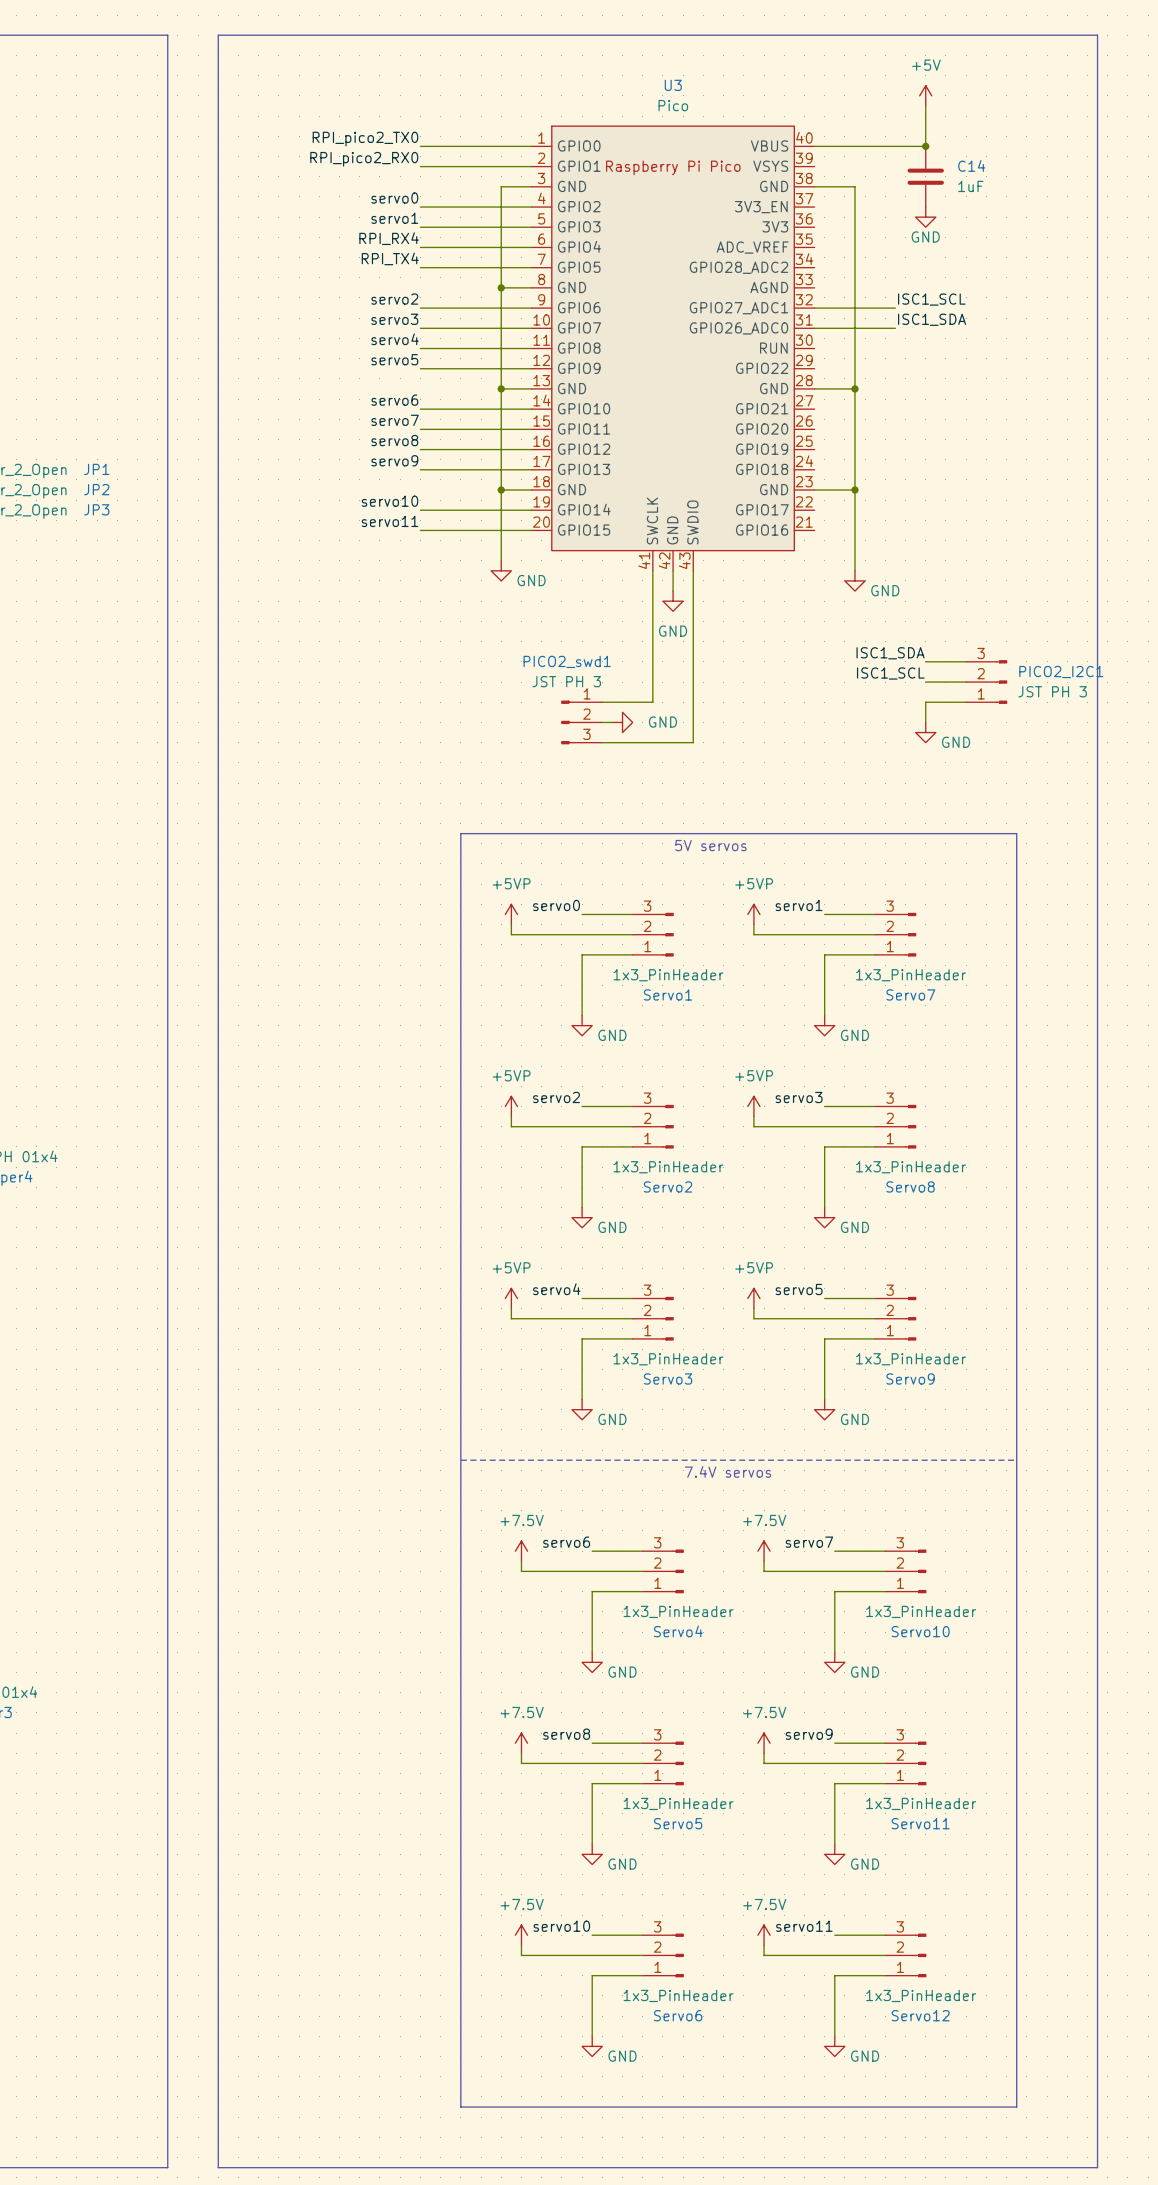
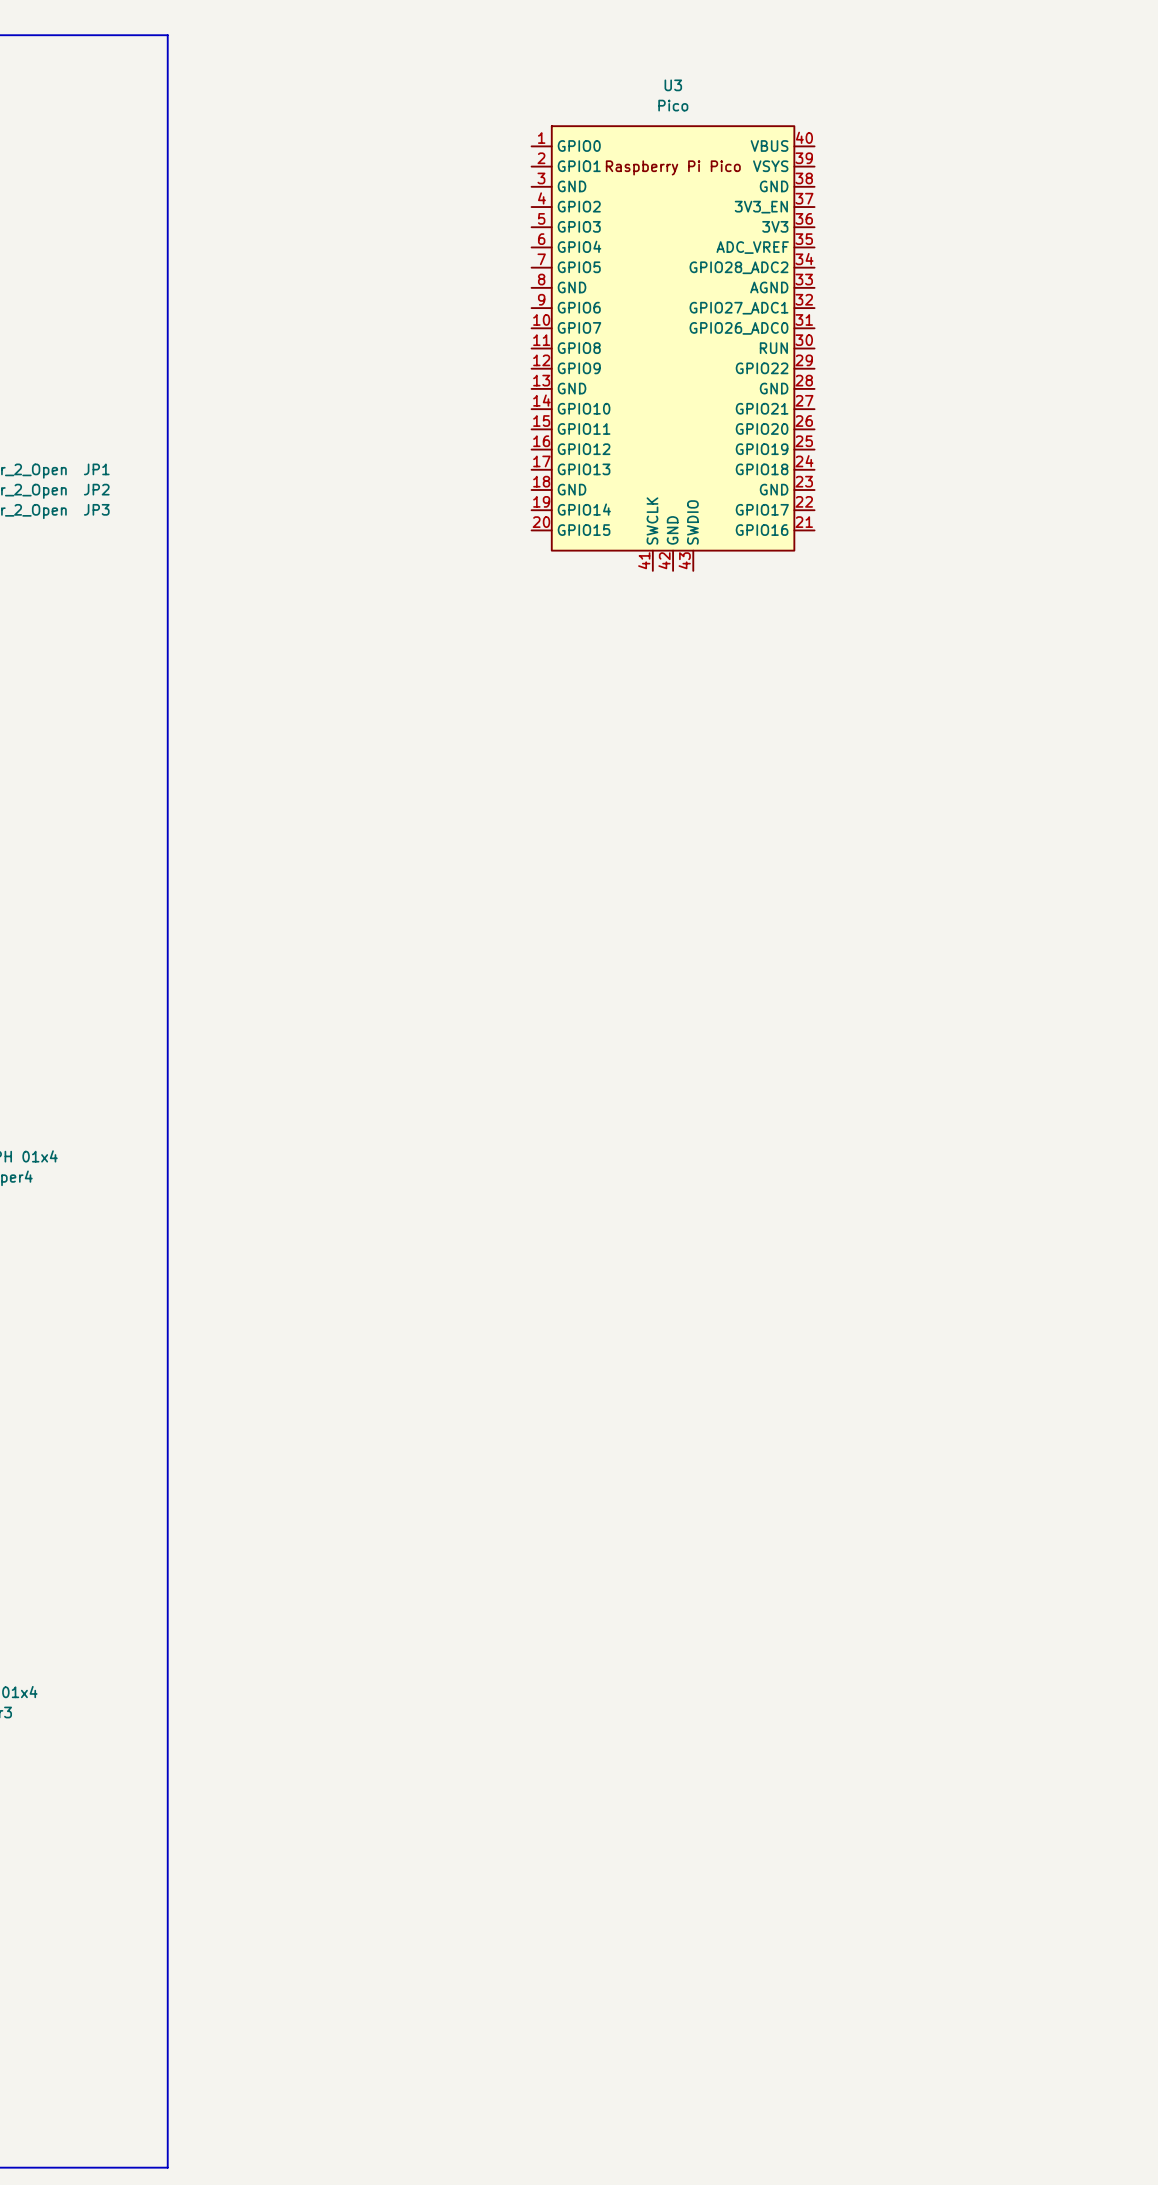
line: (218, 35) (1097, 35) (1097, 2167) (218, 2167) (218, 35) -> none
power symbol: +5V (925, 95) -> none
wire: (925, 105) (925, 146) (814, 146) -> none
label: RPI_pico2_TX0 (365, 139) -> none
wire: (420, 146) (531, 146) -> none
junction: (925, 146) -> none
label: RPI_pico2_RX0 (364, 159) -> none
wire: (420, 166) (531, 166) -> none
C14: 1uF (925, 176) -> none
wire: (531, 186) (501, 186) (501, 560) -> none
wire: (814, 186) (854, 186) (854, 570) -> none
label: servo0 (394, 198) -> none
wire: (420, 207) (531, 207) -> none
power symbol: GND (925, 217) -> none
label: servo1 (394, 218) -> none
wire: (420, 227) (531, 227) -> none
label: RPI_RX4 (389, 238) -> none
wire: (420, 247) (531, 247) -> none
label: RPI_TX4 (390, 258) -> none
wire: (420, 267) (531, 267) -> none
wire: (501, 287) (531, 287) -> none
junction: (501, 287) -> none
label: servo2 (394, 299) -> none
label: ISC1_SCL (931, 299) -> none
wire: (420, 308) (531, 308) -> none
wire: (814, 308) (895, 308) -> none
label: servo3 (394, 319) -> none
label: ISC1_SDA (932, 319) -> none
wire: (420, 328) (531, 328) -> none
wire: (814, 328) (895, 328) -> none
label: servo4 (395, 339) -> none
wire: (420, 348) (531, 348) -> none
label: servo5 (394, 359) -> none
wire: (420, 368) (531, 368) -> none
wire: (501, 388) (531, 388) -> none
junction: (501, 388) -> none
wire: (814, 388) (854, 388) -> none
junction: (854, 388) -> none
label: servo6 (394, 400) -> none
wire: (420, 409) (531, 409) -> none
label: servo7 (395, 420) -> none
wire: (420, 429) (531, 429) -> none
label: servo8 (394, 440) -> none
wire: (420, 449) (531, 449) -> none
label: servo9 (394, 460) -> none
wire: (420, 469) (531, 469) -> none
wire: (501, 490) (531, 490) -> none
junction: (501, 490) -> none
wire: (814, 490) (854, 490) -> none
junction: (854, 490) -> none
label: servo10 (390, 501) -> none
wire: (420, 510) (531, 510) -> none
label: servo11 (390, 521) -> none
wire: (420, 530) (531, 530) -> none
power symbol: GND (501, 570) -> none
wire: (652, 570) (652, 702) (602, 702) -> none
wire: (673, 570) (673, 591) -> none
wire: (693, 570) (693, 742) (602, 742) -> none
power symbol: GND (854, 580) -> none
power symbol: GND (673, 601) -> none
label: ISC1_SDA (890, 653) -> none
wire: (925, 661) (966, 661) -> none
label: ISC1_SCL (890, 673) -> none
wire: (925, 682) (966, 682) -> none
PICO2_I2C1: JST PH 3 (986, 682) -> none
wire: (966, 702) (925, 702) (925, 722) -> none
PICO2_swd1: JST PH 3 (581, 722) -> none
wire: (602, 722) (612, 722) -> none
power symbol: GND (622, 722) -> none
power symbol: GND (925, 732) -> none
line: (460, 833) (1016, 833) (1016, 2107) (460, 2107) (460, 833) -> none
text: 5V servos (710, 845) -> none
label: servo0 (556, 905) -> none
label: servo1 (799, 905) -> none
power symbol: +5VP (511, 914) -> none
wire: (582, 914) (632, 914) -> none
power symbol: +5VP (753, 914) -> none
wire: (824, 914) (875, 914) -> none
wire: (511, 924) (511, 934) (632, 934) -> none
wire: (753, 924) (753, 934) (875, 934) -> none
Servo1: 1x3_PinHeader (653, 934) -> none
Servo7: 1x3_PinHeader (895, 934) -> none
wire: (632, 954) (582, 954) (582, 1015) -> none
wire: (875, 954) (824, 954) (824, 1015) -> none
power symbol: GND (582, 1025) -> none
power symbol: GND (824, 1025) -> none
label: servo2 (556, 1097) -> none
label: servo3 (799, 1097) -> none
power symbol: +5VP (511, 1106) -> none
wire: (582, 1106) (632, 1106) -> none
power symbol: +5VP (753, 1106) -> none
wire: (824, 1106) (875, 1106) -> none
wire: (511, 1116) (511, 1126) (632, 1126) -> none
wire: (753, 1116) (753, 1126) (875, 1126) -> none
Servo2: 1x3_PinHeader (653, 1126) -> none
Servo8: 1x3_PinHeader (895, 1126) -> none
wire: (632, 1146) (582, 1146) (582, 1207) -> none
wire: (875, 1146) (824, 1146) (824, 1207) -> none
power symbol: GND (582, 1217) -> none
power symbol: GND (824, 1217) -> none
label: servo4 (556, 1289) -> none
label: servo5 (799, 1289) -> none
power symbol: +5VP (511, 1298) -> none
wire: (582, 1298) (632, 1298) -> none
power symbol: +5VP (753, 1298) -> none
wire: (824, 1298) (875, 1298) -> none
wire: (511, 1308) (511, 1318) (632, 1318) -> none
wire: (753, 1308) (753, 1318) (875, 1318) -> none
Servo3: 1x3_PinHeader (653, 1318) -> none
Servo9: 1x3_PinHeader (895, 1318) -> none
wire: (632, 1338) (582, 1338) (582, 1399) -> none
wire: (875, 1338) (824, 1338) (824, 1399) -> none
power symbol: GND (582, 1409) -> none
power symbol: GND (824, 1409) -> none
line: (460, 1460) (1016, 1460) -> none
text: 7.4V servos (728, 1471) -> none
label: servo6 (566, 1542) -> none
label: servo7 (809, 1542) -> none
power symbol: +7.5V (521, 1551) -> none
wire: (592, 1551) (642, 1551) -> none
power symbol: +7.5V (764, 1551) -> none
wire: (834, 1551) (885, 1551) -> none
wire: (521, 1561) (521, 1571) (642, 1571) -> none
wire: (764, 1561) (764, 1571) (885, 1571) -> none
Servo4: 1x3_PinHeader (663, 1571) -> none
Servo10: 1x3_PinHeader (905, 1571) -> none
wire: (642, 1591) (592, 1591) (592, 1652) -> none
wire: (885, 1591) (834, 1591) (834, 1652) -> none
power symbol: GND (592, 1662) -> none
power symbol: GND (834, 1662) -> none
label: servo8 (566, 1734) -> none
label: servo9 (809, 1734) -> none
power symbol: +7.5V (521, 1743) -> none
wire: (592, 1743) (642, 1743) -> none
power symbol: +7.5V (764, 1743) -> none
wire: (834, 1743) (885, 1743) -> none
wire: (521, 1753) (521, 1763) (642, 1763) -> none
wire: (764, 1753) (764, 1763) (885, 1763) -> none
Servo5: 1x3_PinHeader (663, 1763) -> none
Servo11: 1x3_PinHeader (905, 1763) -> none
wire: (642, 1783) (592, 1783) (592, 1844) -> none
wire: (885, 1783) (834, 1783) (834, 1844) -> none
power symbol: GND (592, 1854) -> none
power symbol: GND (834, 1854) -> none
label: servo10 (561, 1926) -> none
label: servo11 (804, 1926) -> none
power symbol: +7.5V (521, 1935) -> none
wire: (592, 1935) (642, 1935) -> none
power symbol: +7.5V (764, 1935) -> none
wire: (834, 1935) (885, 1935) -> none
wire: (521, 1945) (521, 1955) (642, 1955) -> none
wire: (764, 1945) (764, 1955) (885, 1955) -> none
Servo6: 1x3_PinHeader (663, 1955) -> none
Servo12: 1x3_PinHeader (905, 1955) -> none
wire: (642, 1975) (592, 1975) (592, 2036) -> none
wire: (885, 1975) (834, 1975) (834, 2036) -> none
power symbol: GND (592, 2046) -> none
power symbol: GND (834, 2046) -> none

